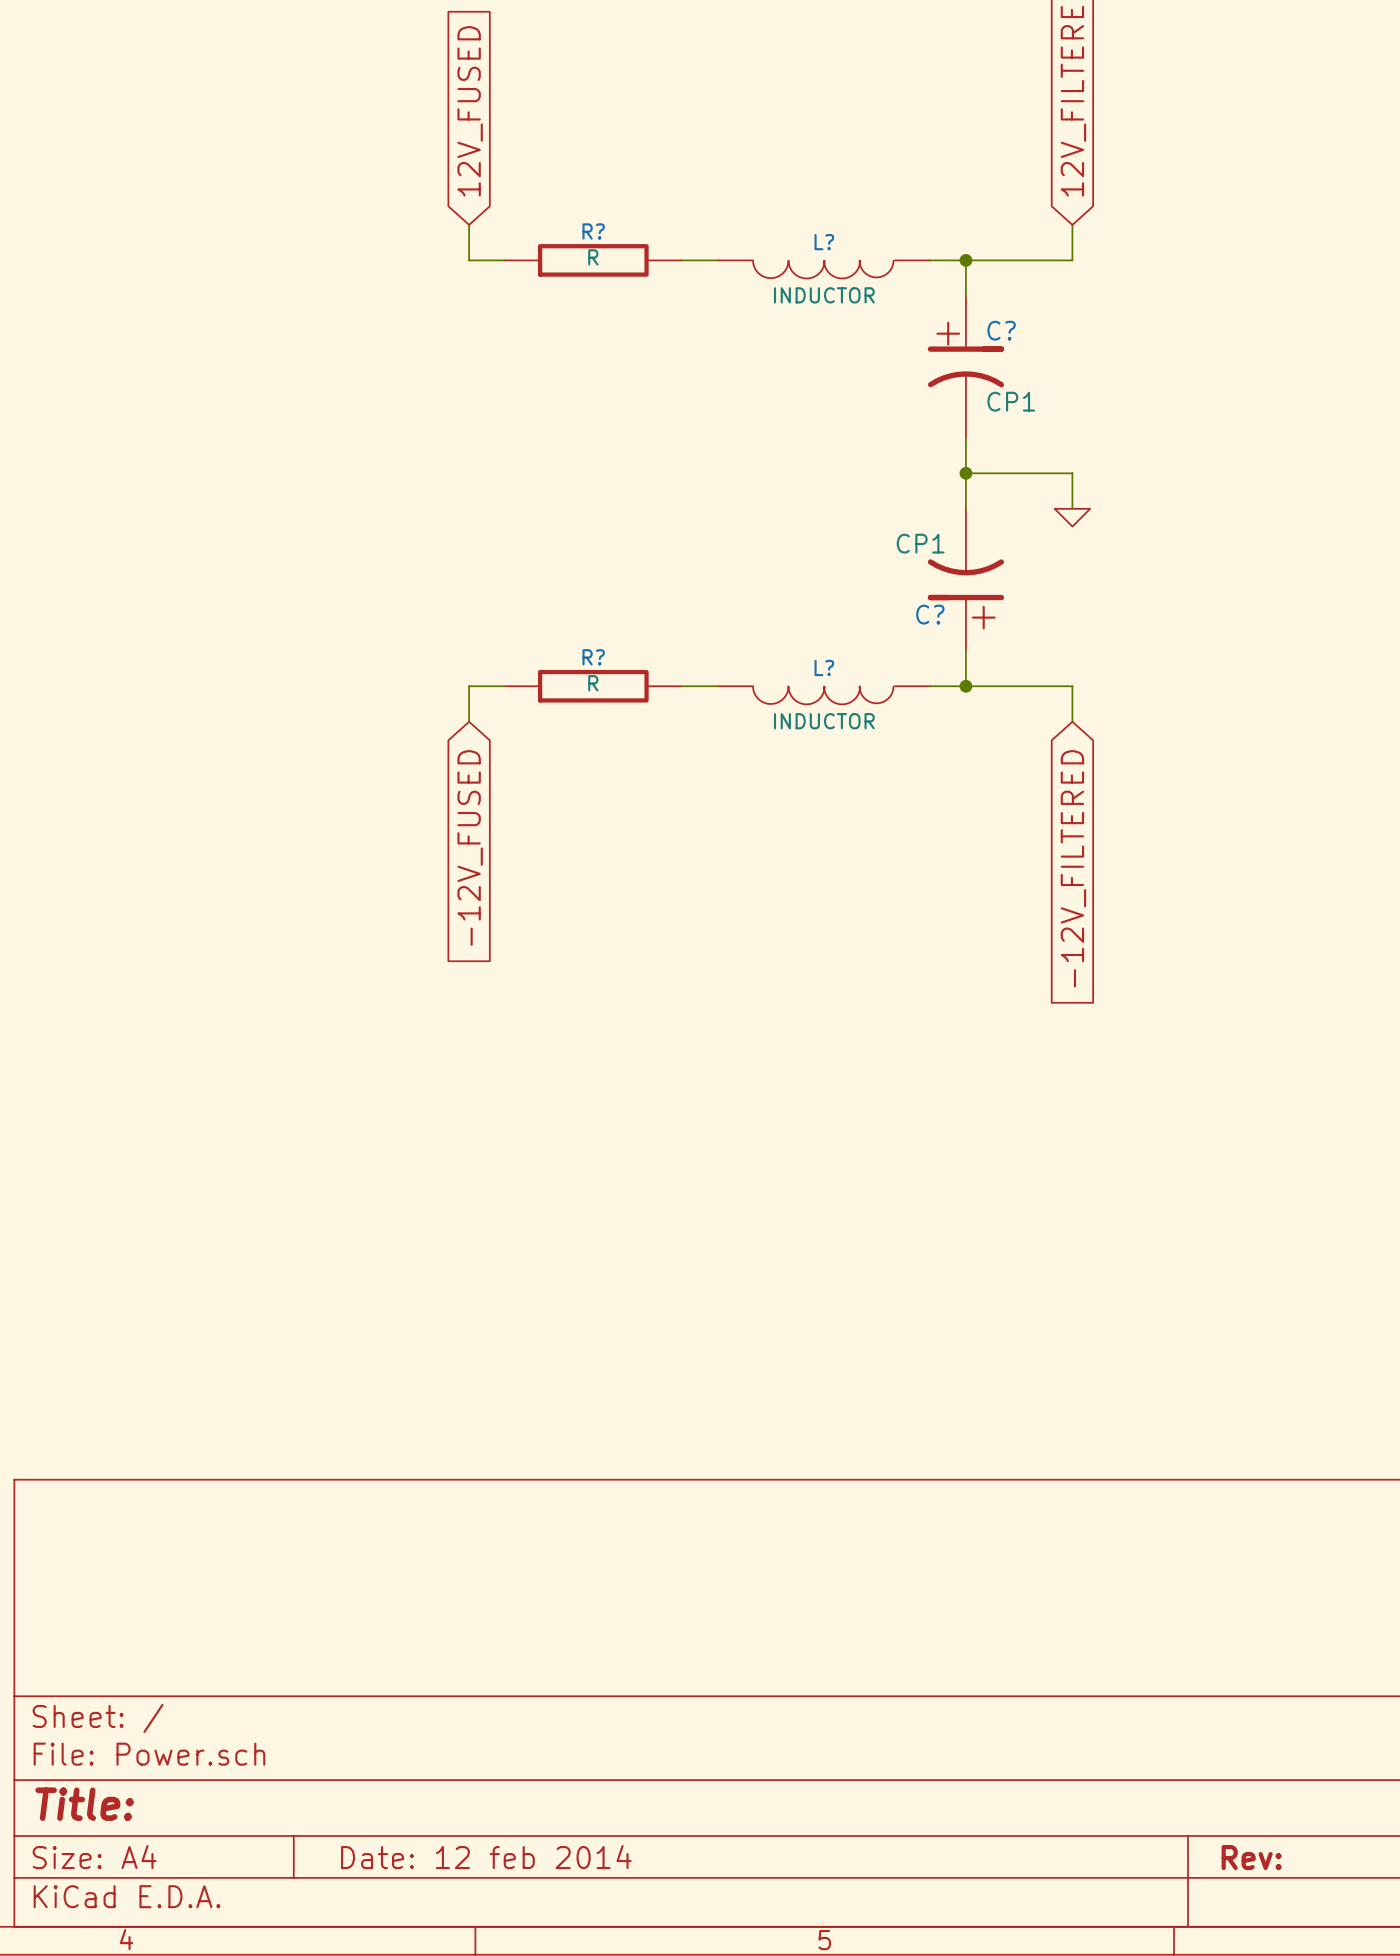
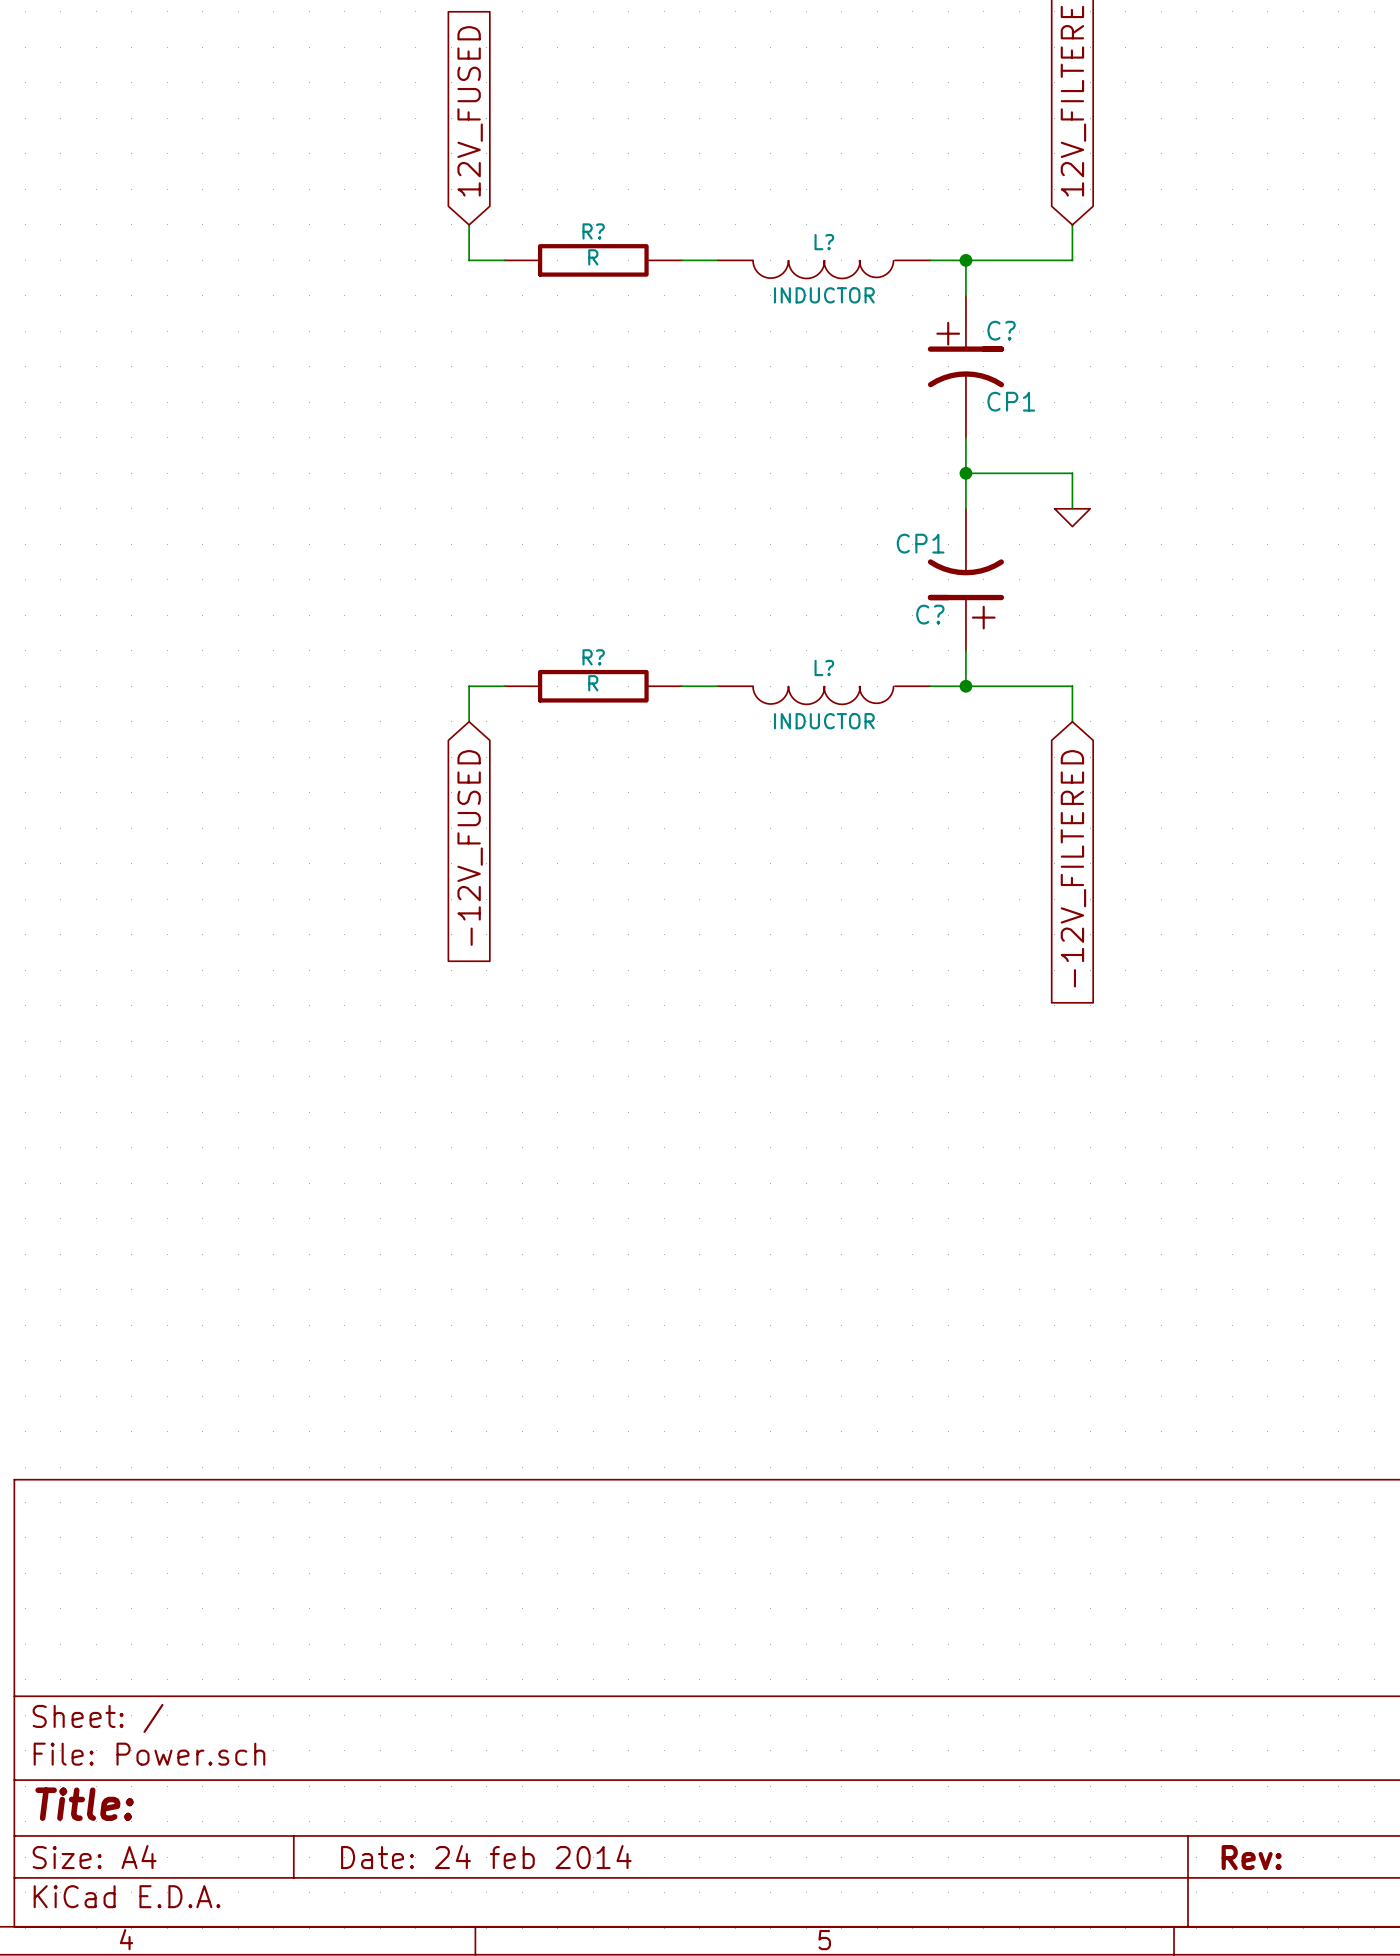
title block: Date: 12 feb 2014 (486, 1857) -> Date: 24 feb 2014 (486, 1857)

